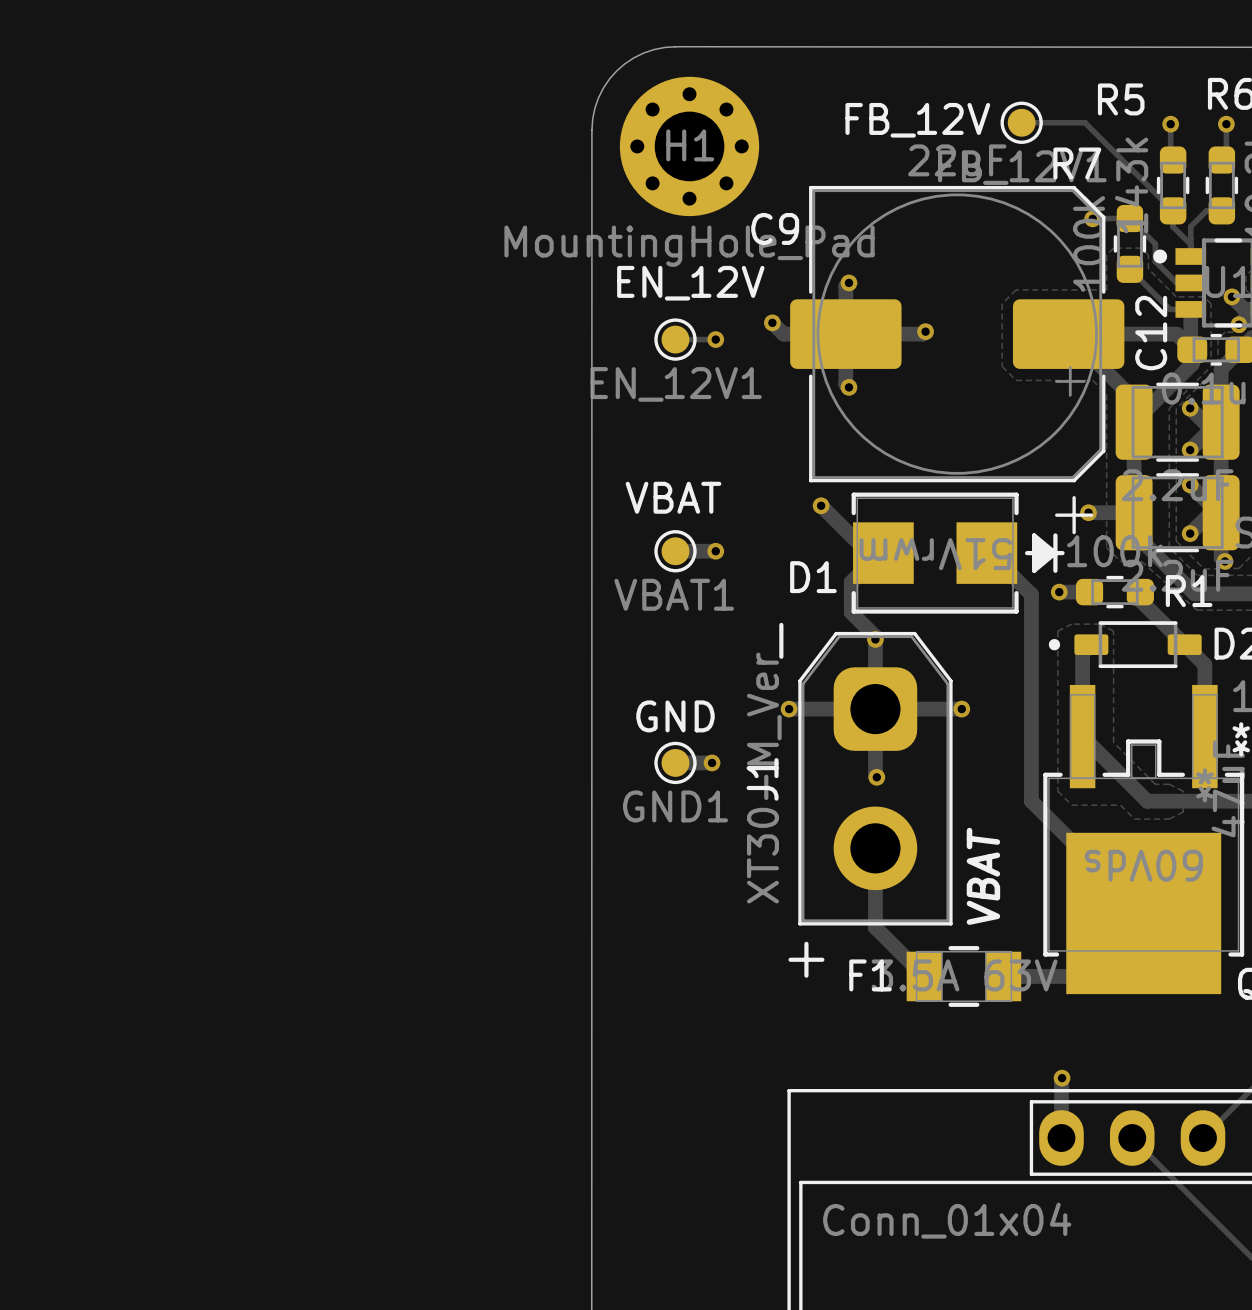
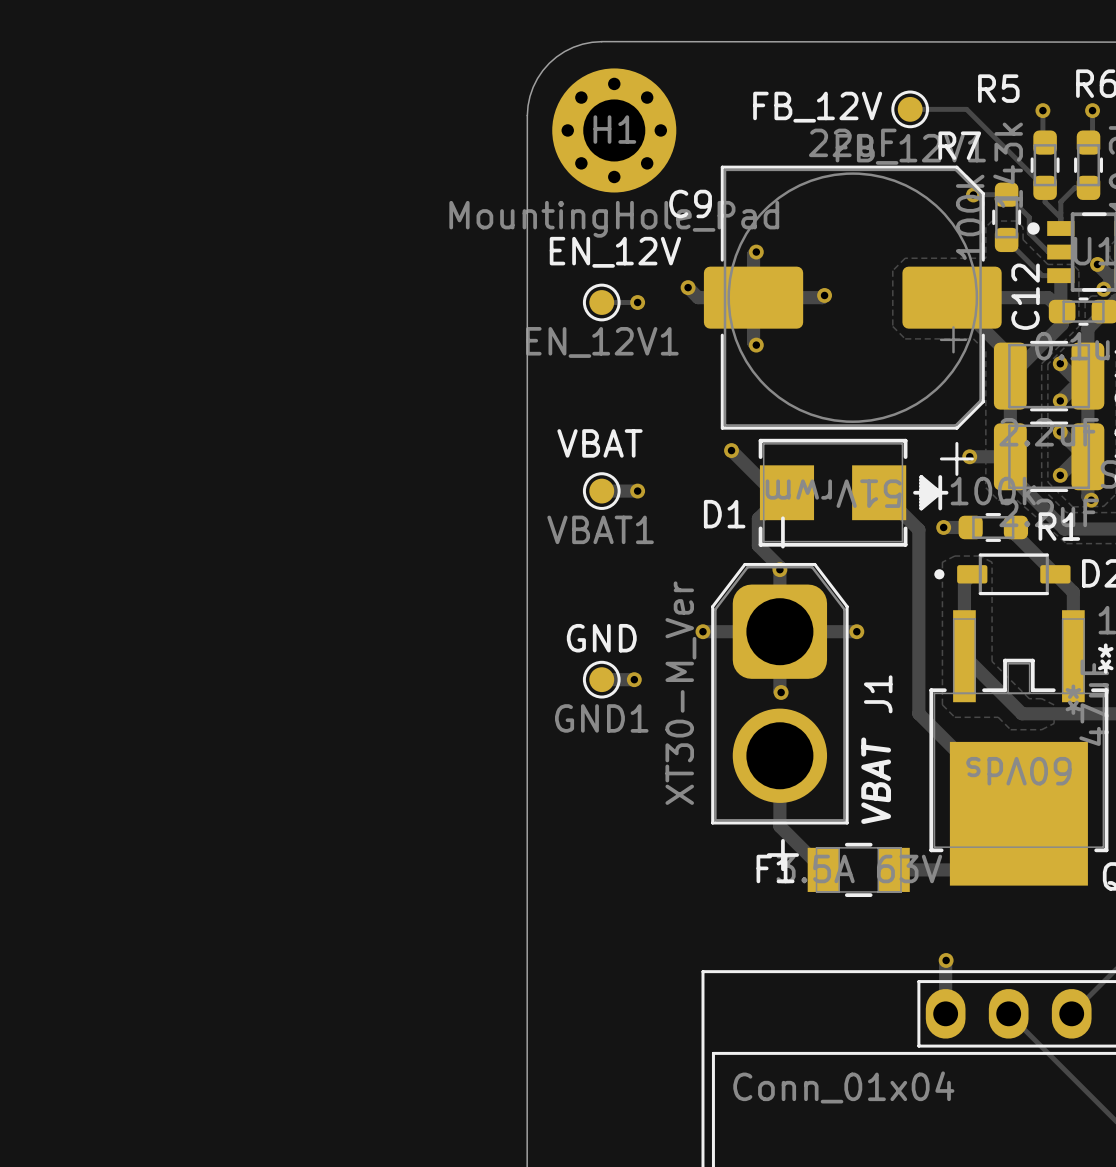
J1 footprint: [798, 631, 953, 926] -> [711, 562, 849, 825]
J1 name position: J1 (762, 779) -> J1 (878, 694)

